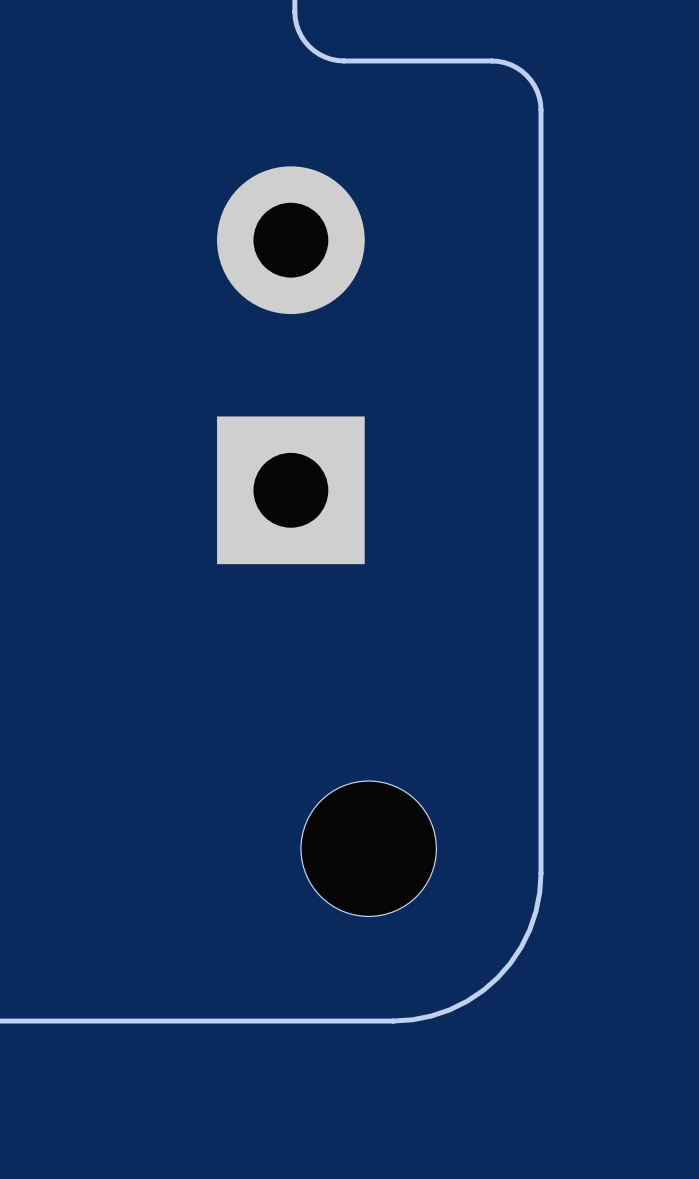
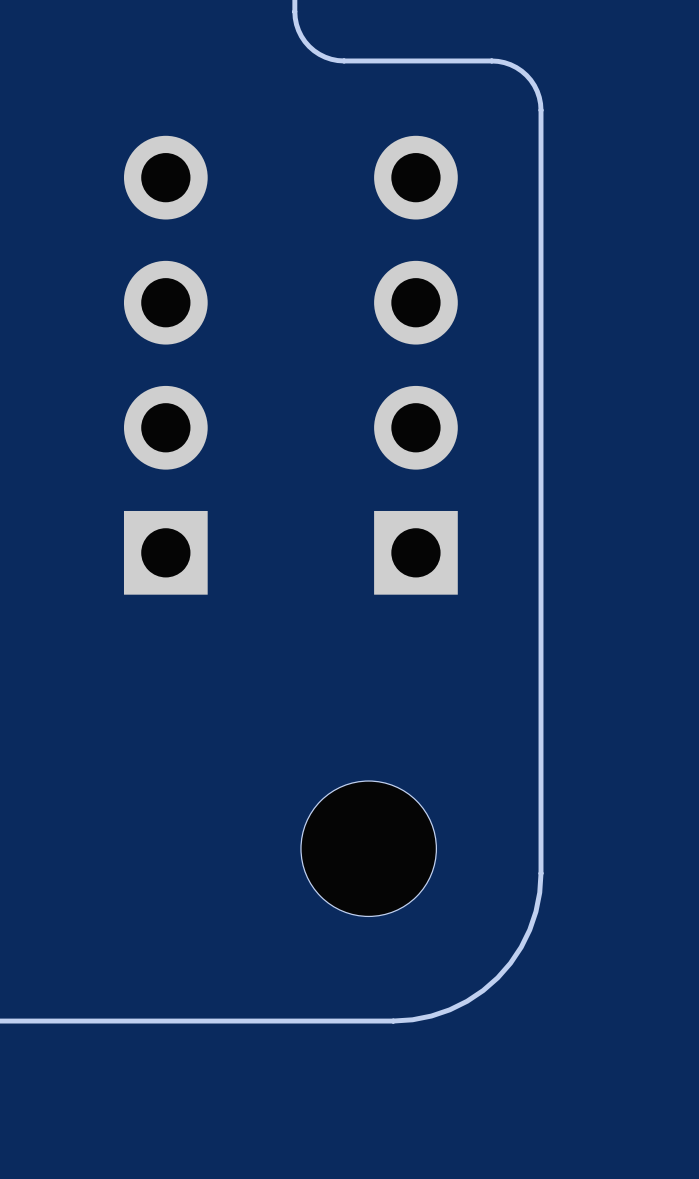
part: none -> (165, 365)
part: (290, 365) -> none
part: none -> (415, 365)

